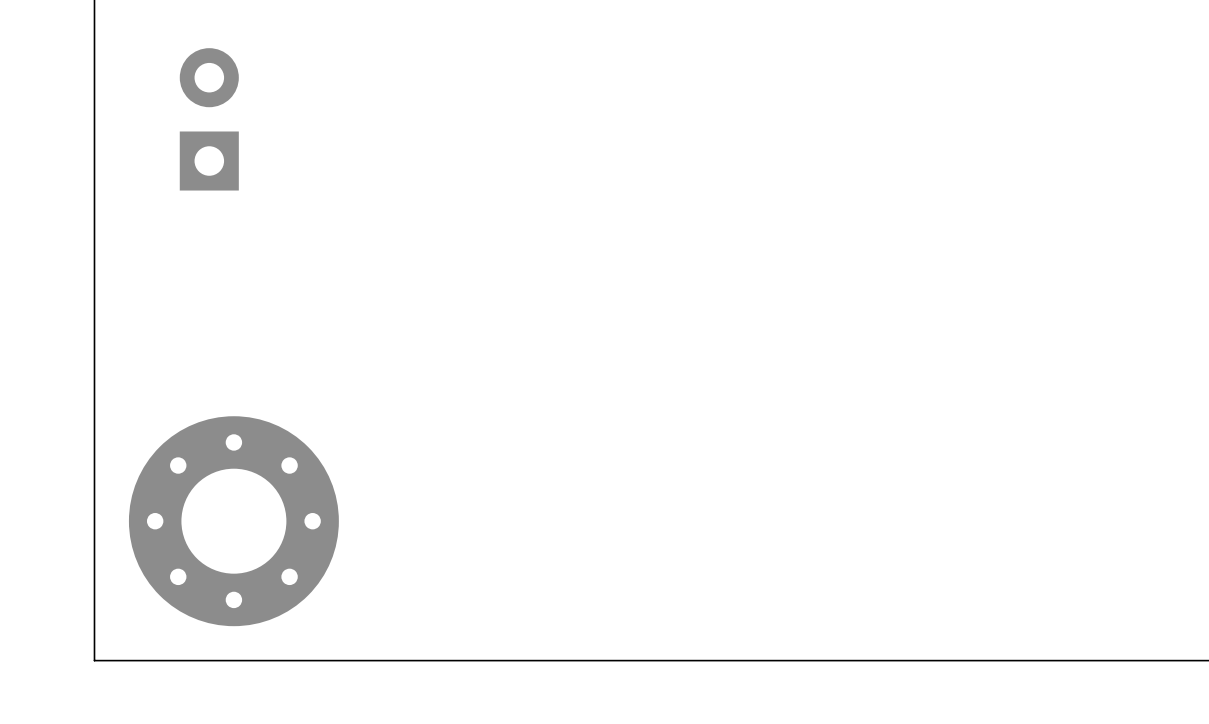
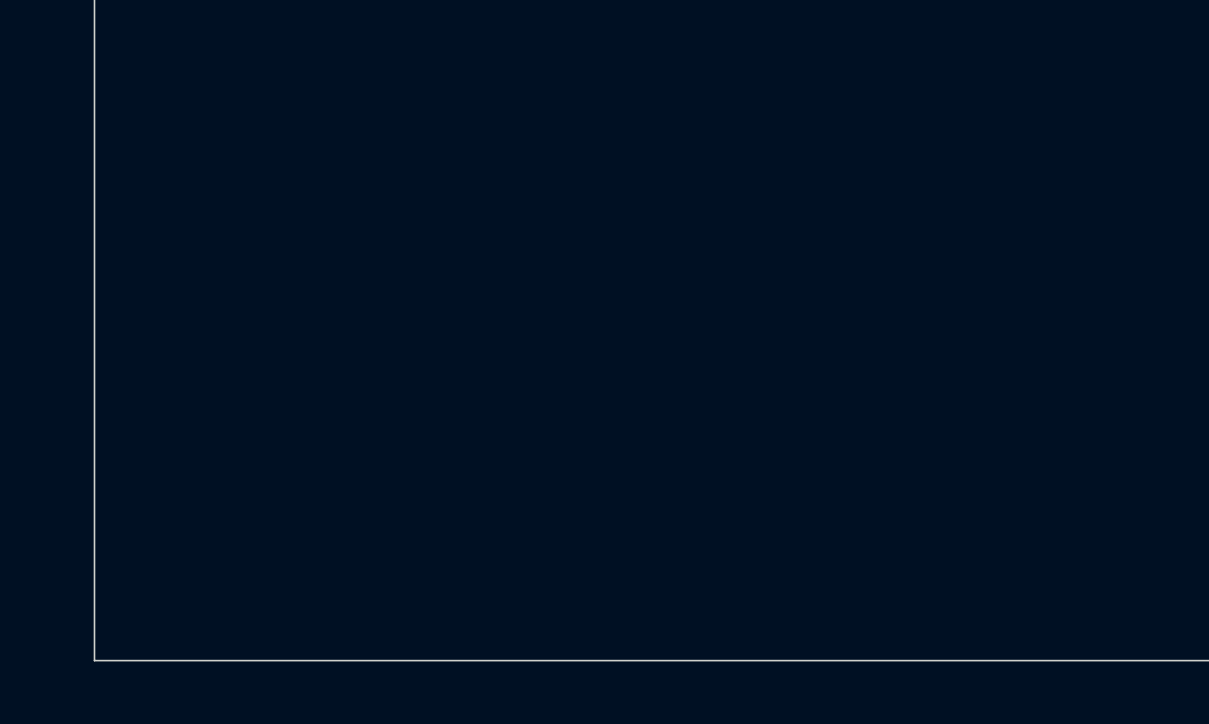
part: (209, 119) -> none
part: (233, 521) -> none

